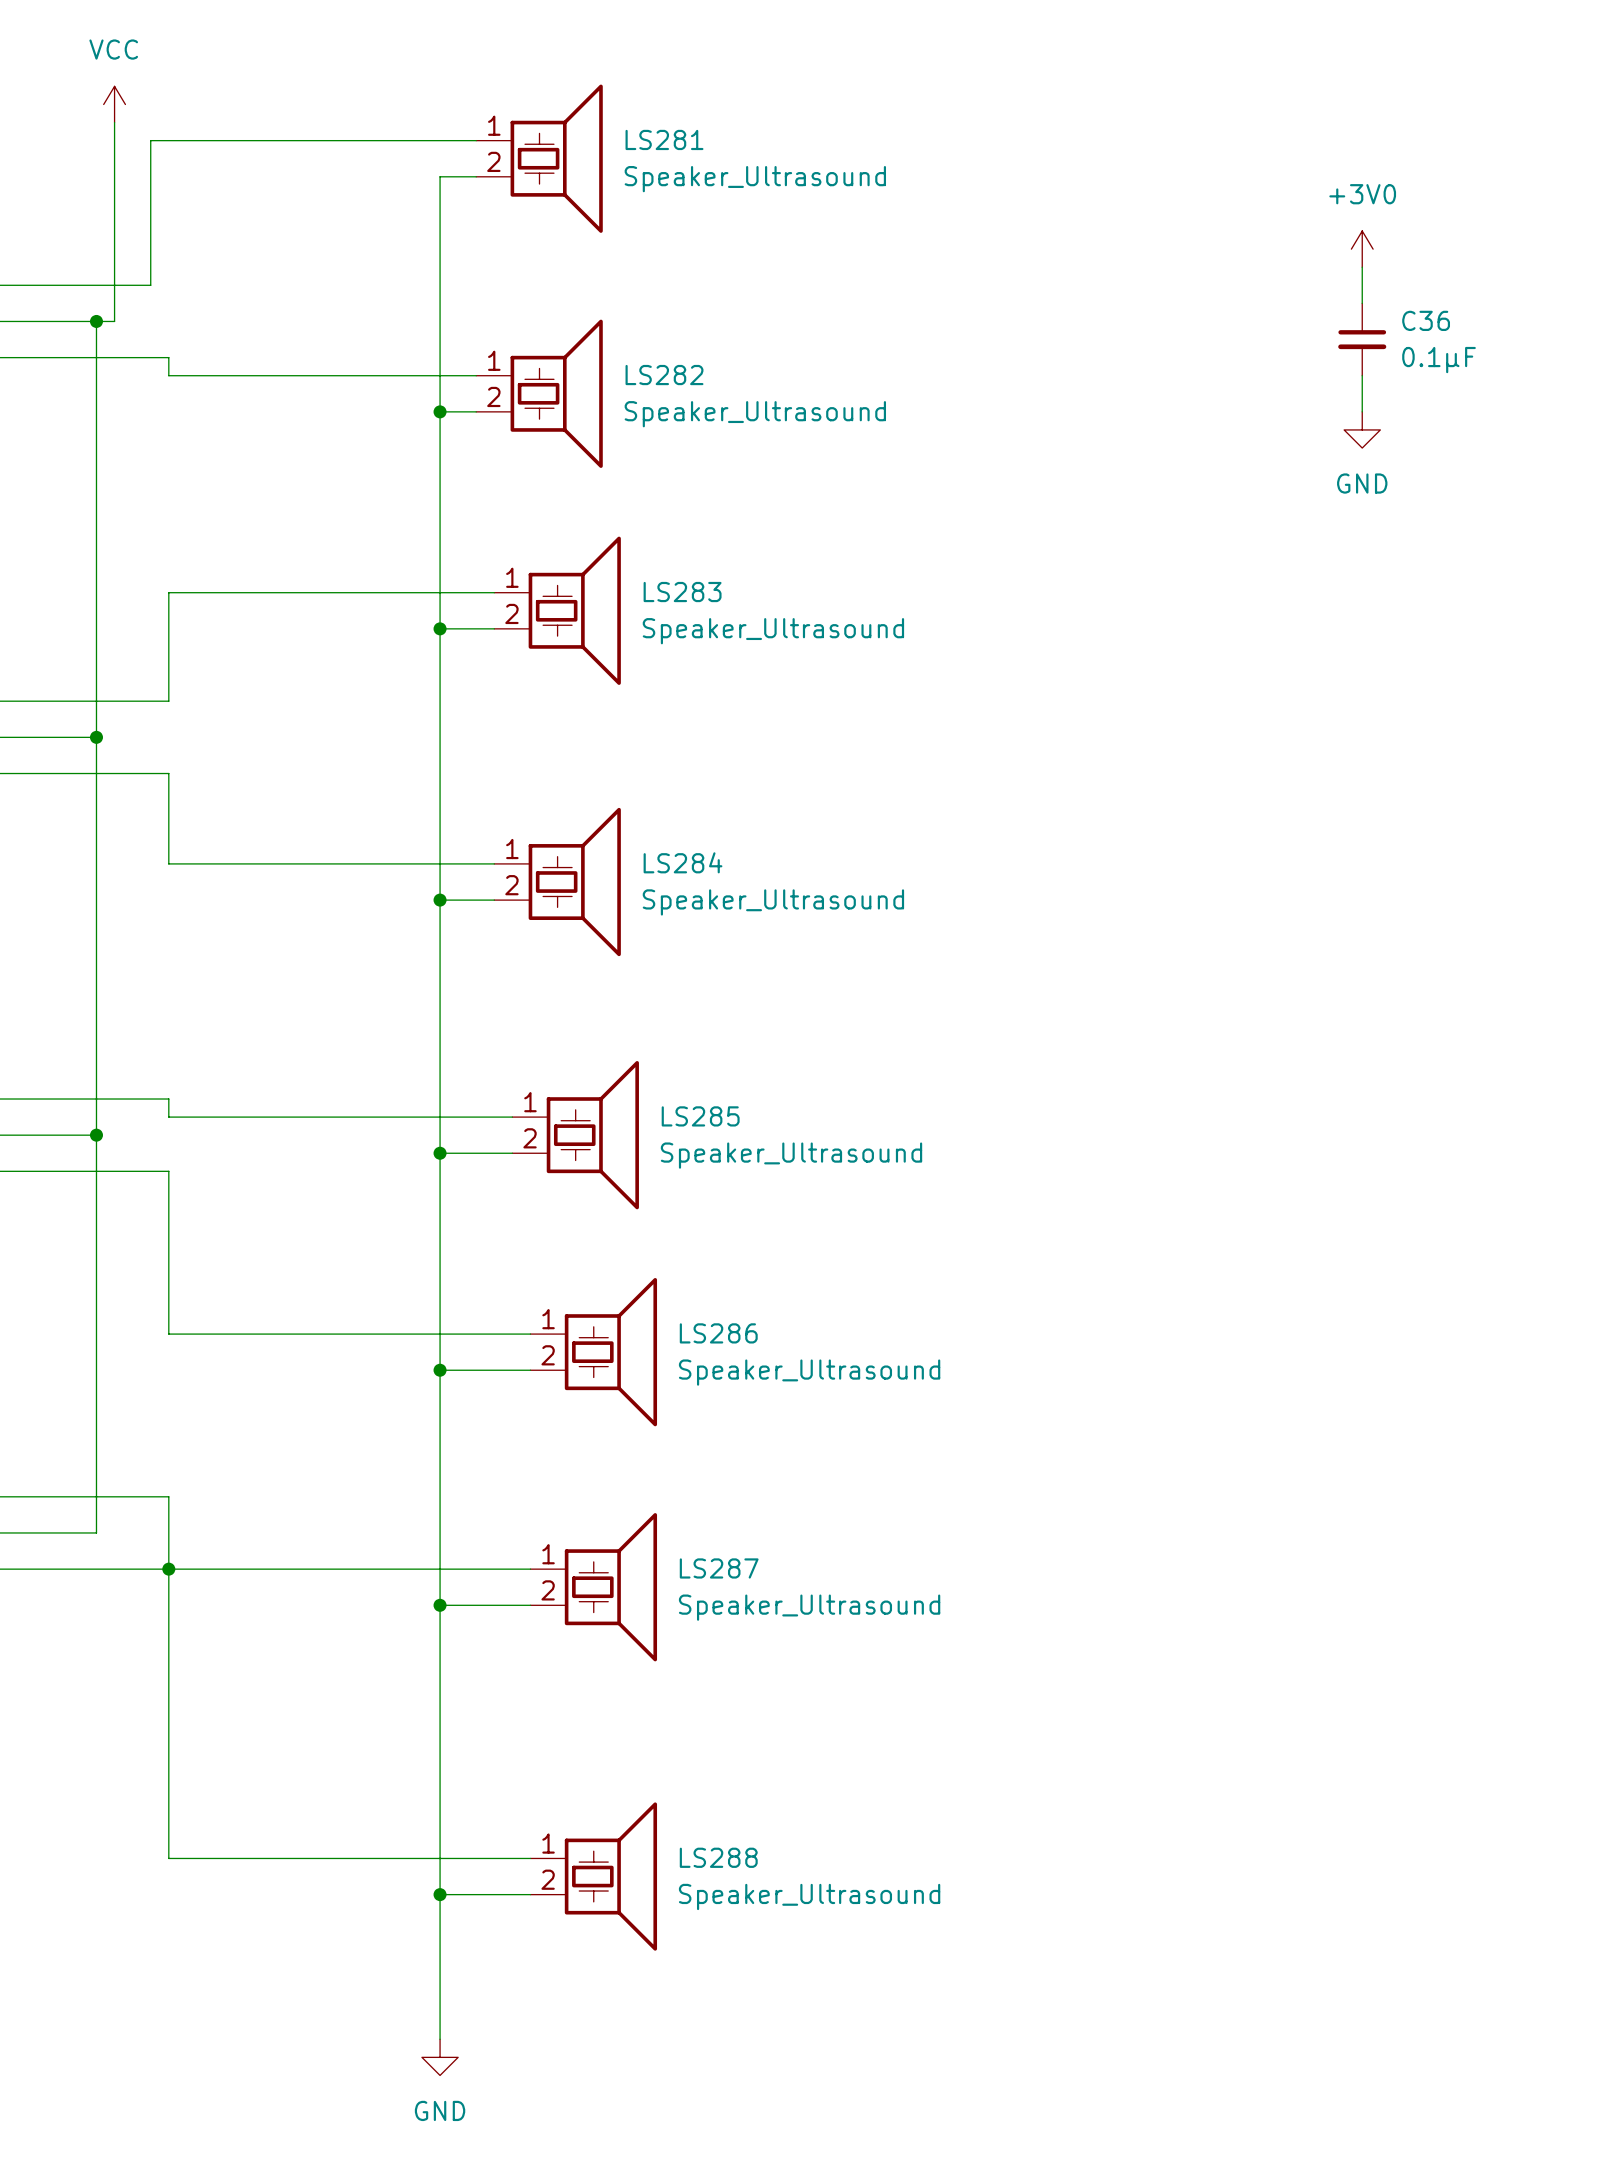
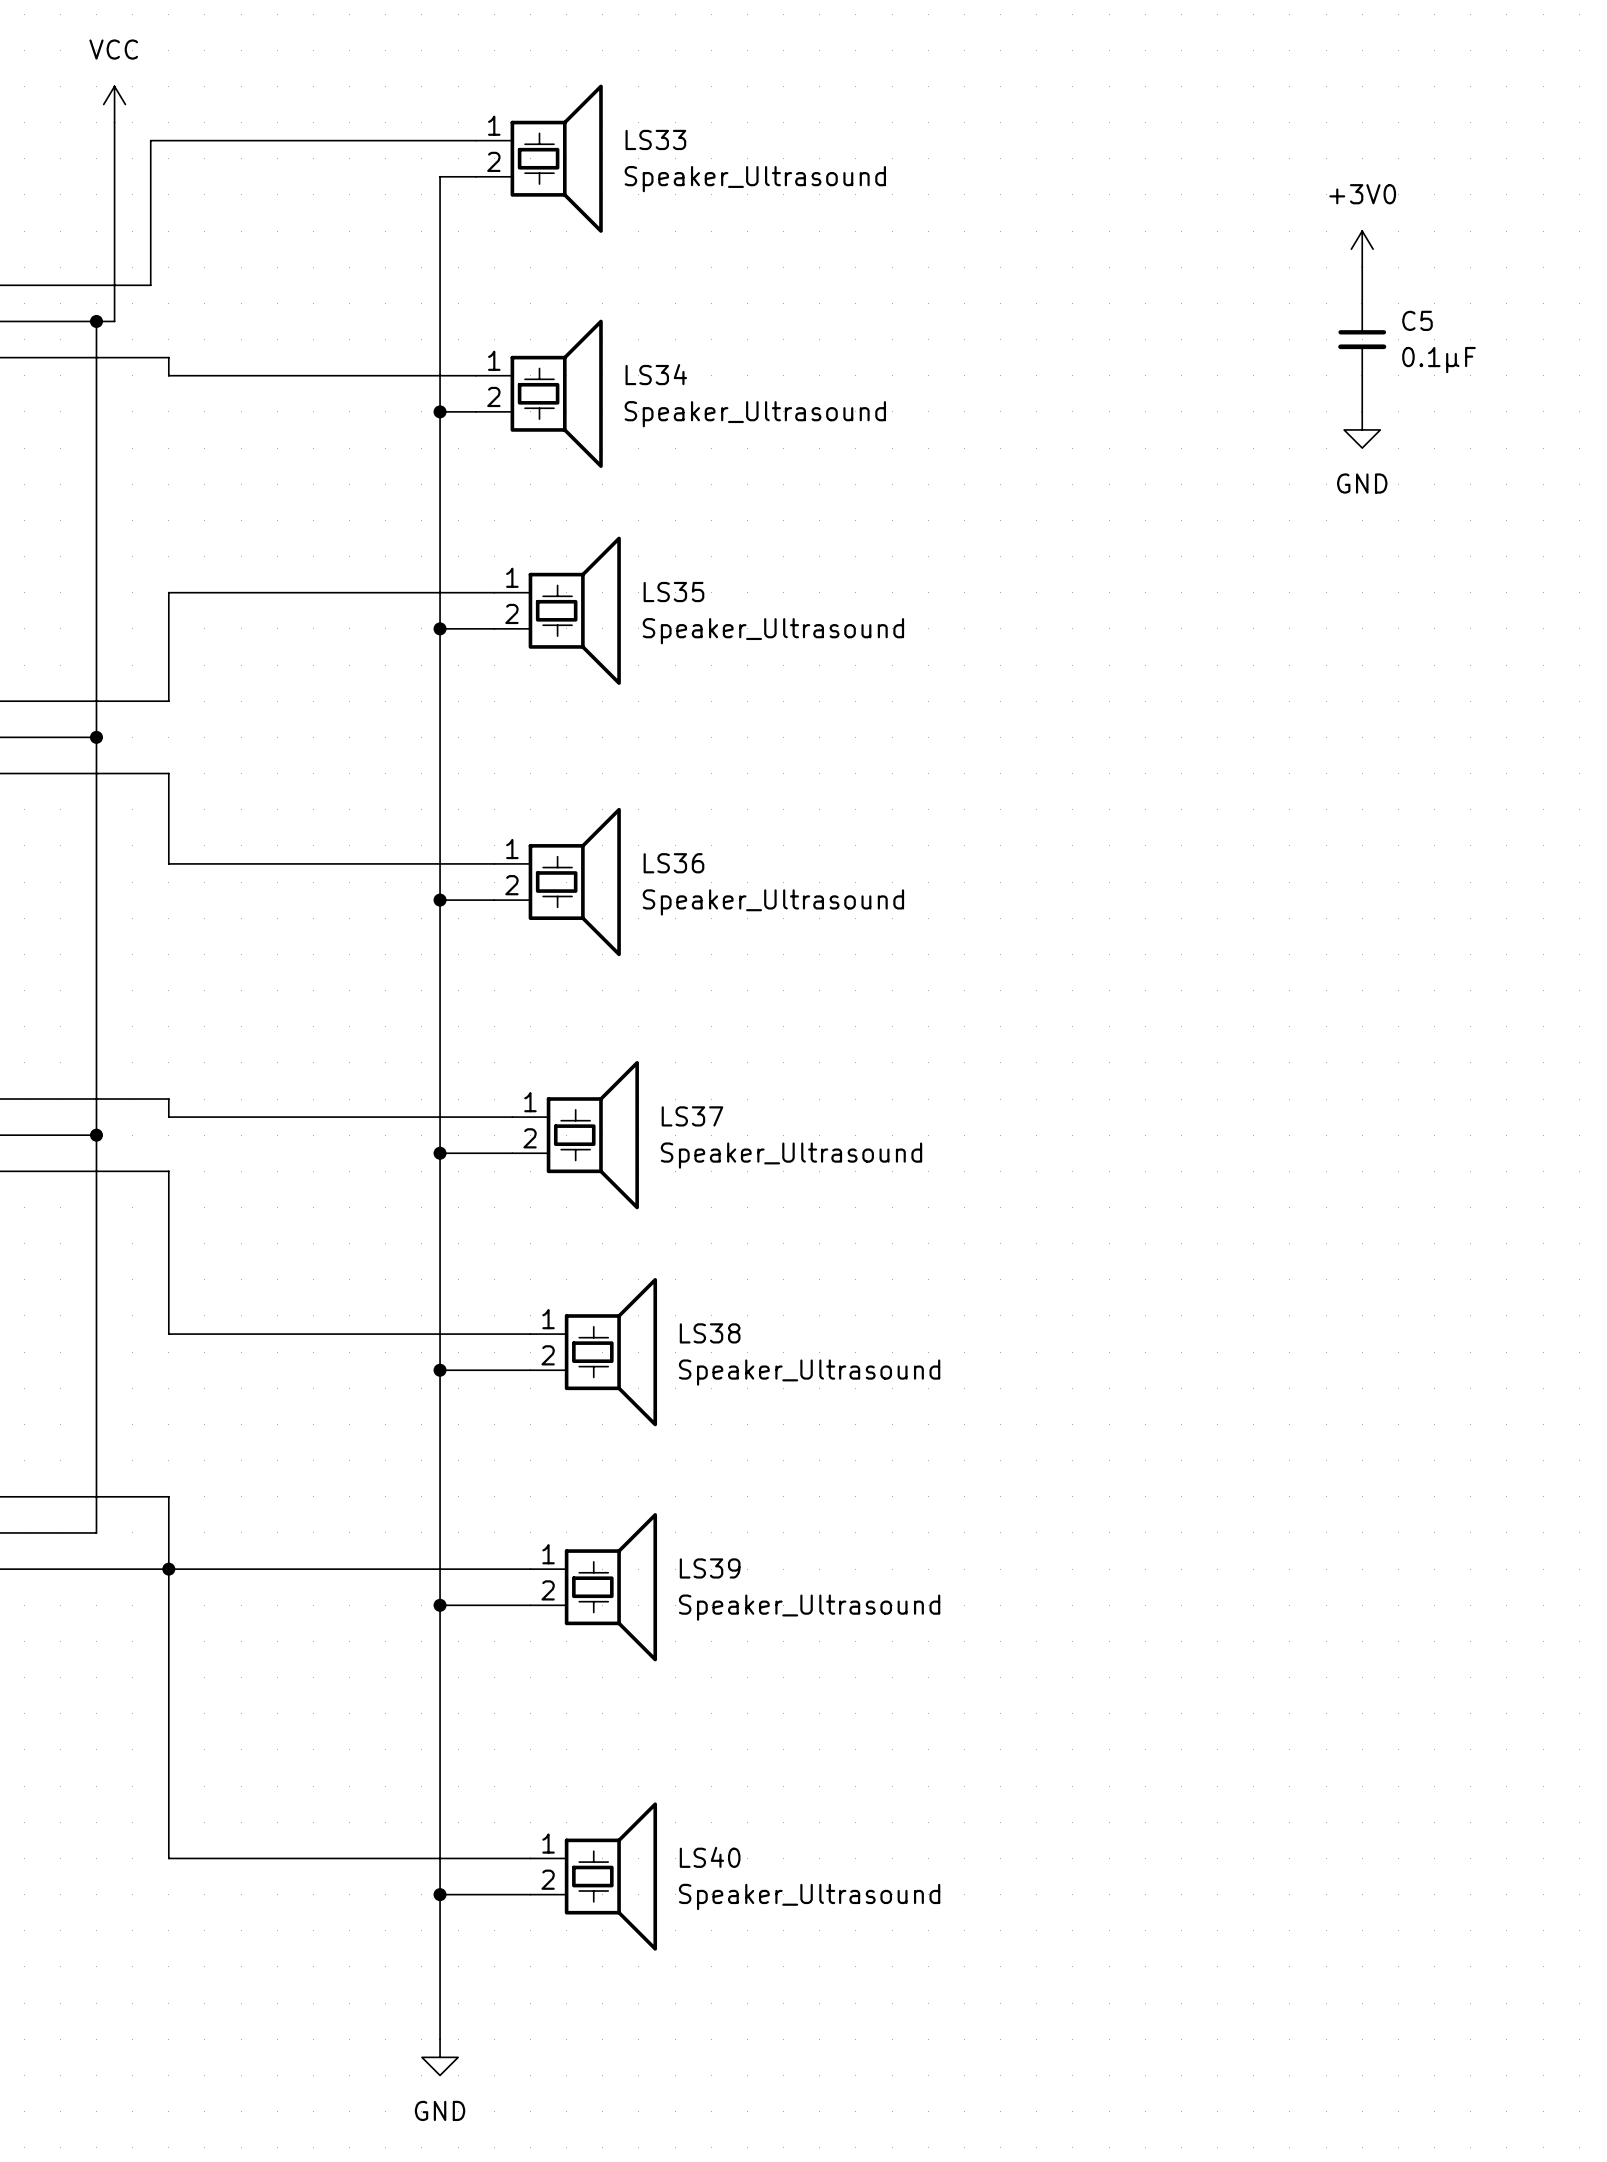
LS281 name: LS281 (664, 139) -> LS33 (655, 139)
C36 name: C36 (1426, 320) -> C5 (1417, 320)
LS282 name: LS282 (664, 375) -> LS34 (656, 374)
LS283 name: LS283 (682, 592) -> LS35 (673, 592)
LS284 name: LS284 (683, 862) -> LS36 (673, 863)
LS285 name: LS285 (700, 1116) -> LS37 (692, 1116)
LS286 name: LS286 (718, 1333) -> LS38 (710, 1333)
LS287 name: LS287 (719, 1568) -> LS39 (710, 1568)
LS288 name: LS288 (718, 1857) -> LS40 (710, 1857)

